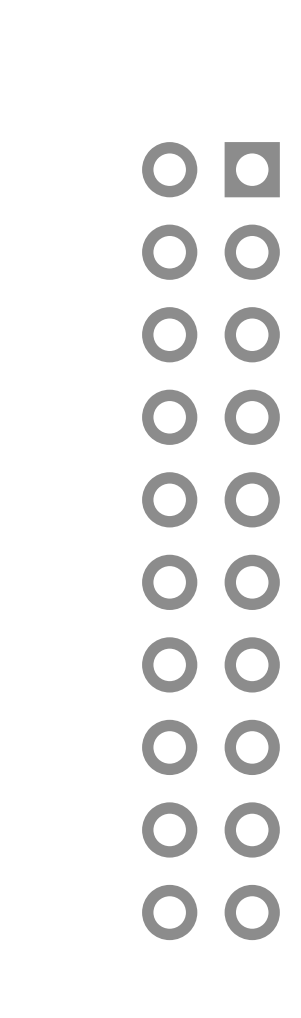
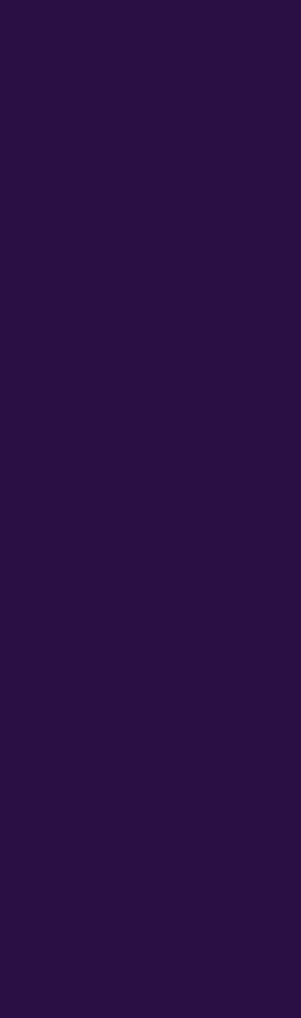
part: (210, 541) -> none

